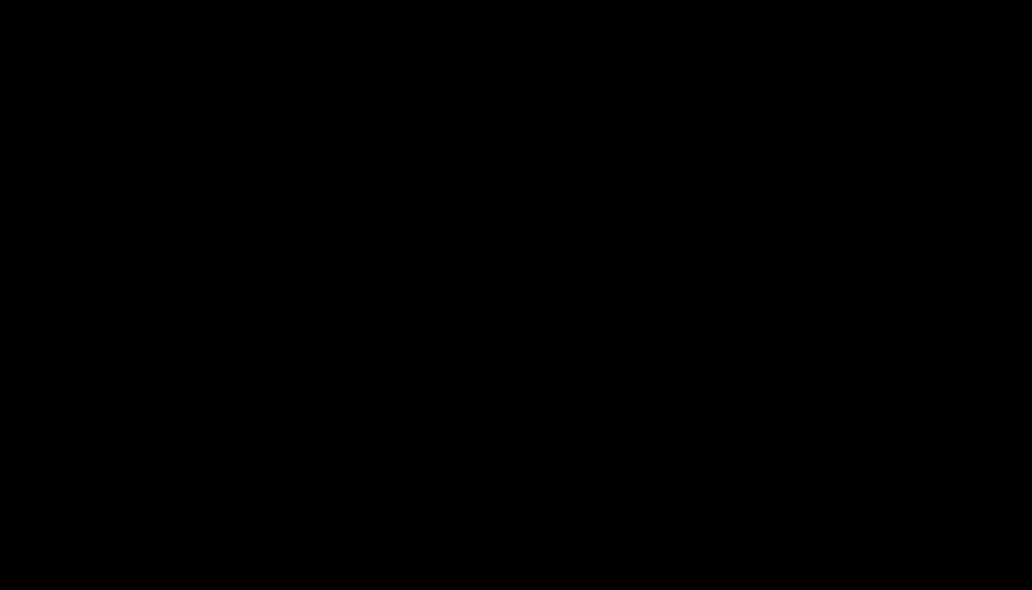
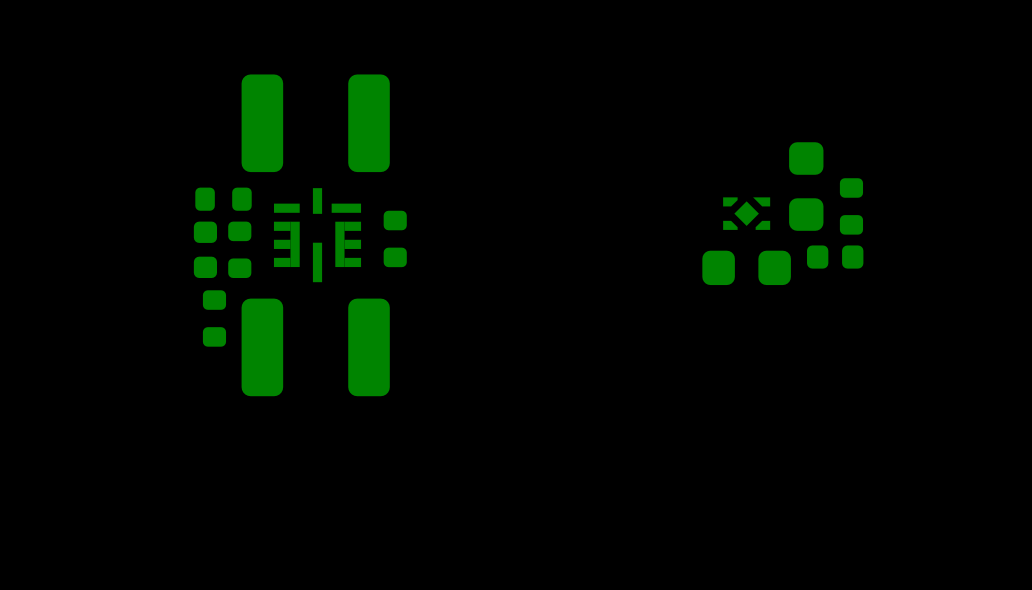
part: none -> (315, 123)
part: none -> (806, 186)
part: none -> (223, 199)
part: none -> (851, 206)
part: none -> (746, 213)
part: none -> (317, 235)
part: none -> (395, 238)
part: none -> (205, 249)
part: none -> (239, 249)
part: none -> (835, 257)
part: none -> (746, 267)
part: none -> (214, 318)
part: none -> (315, 347)

